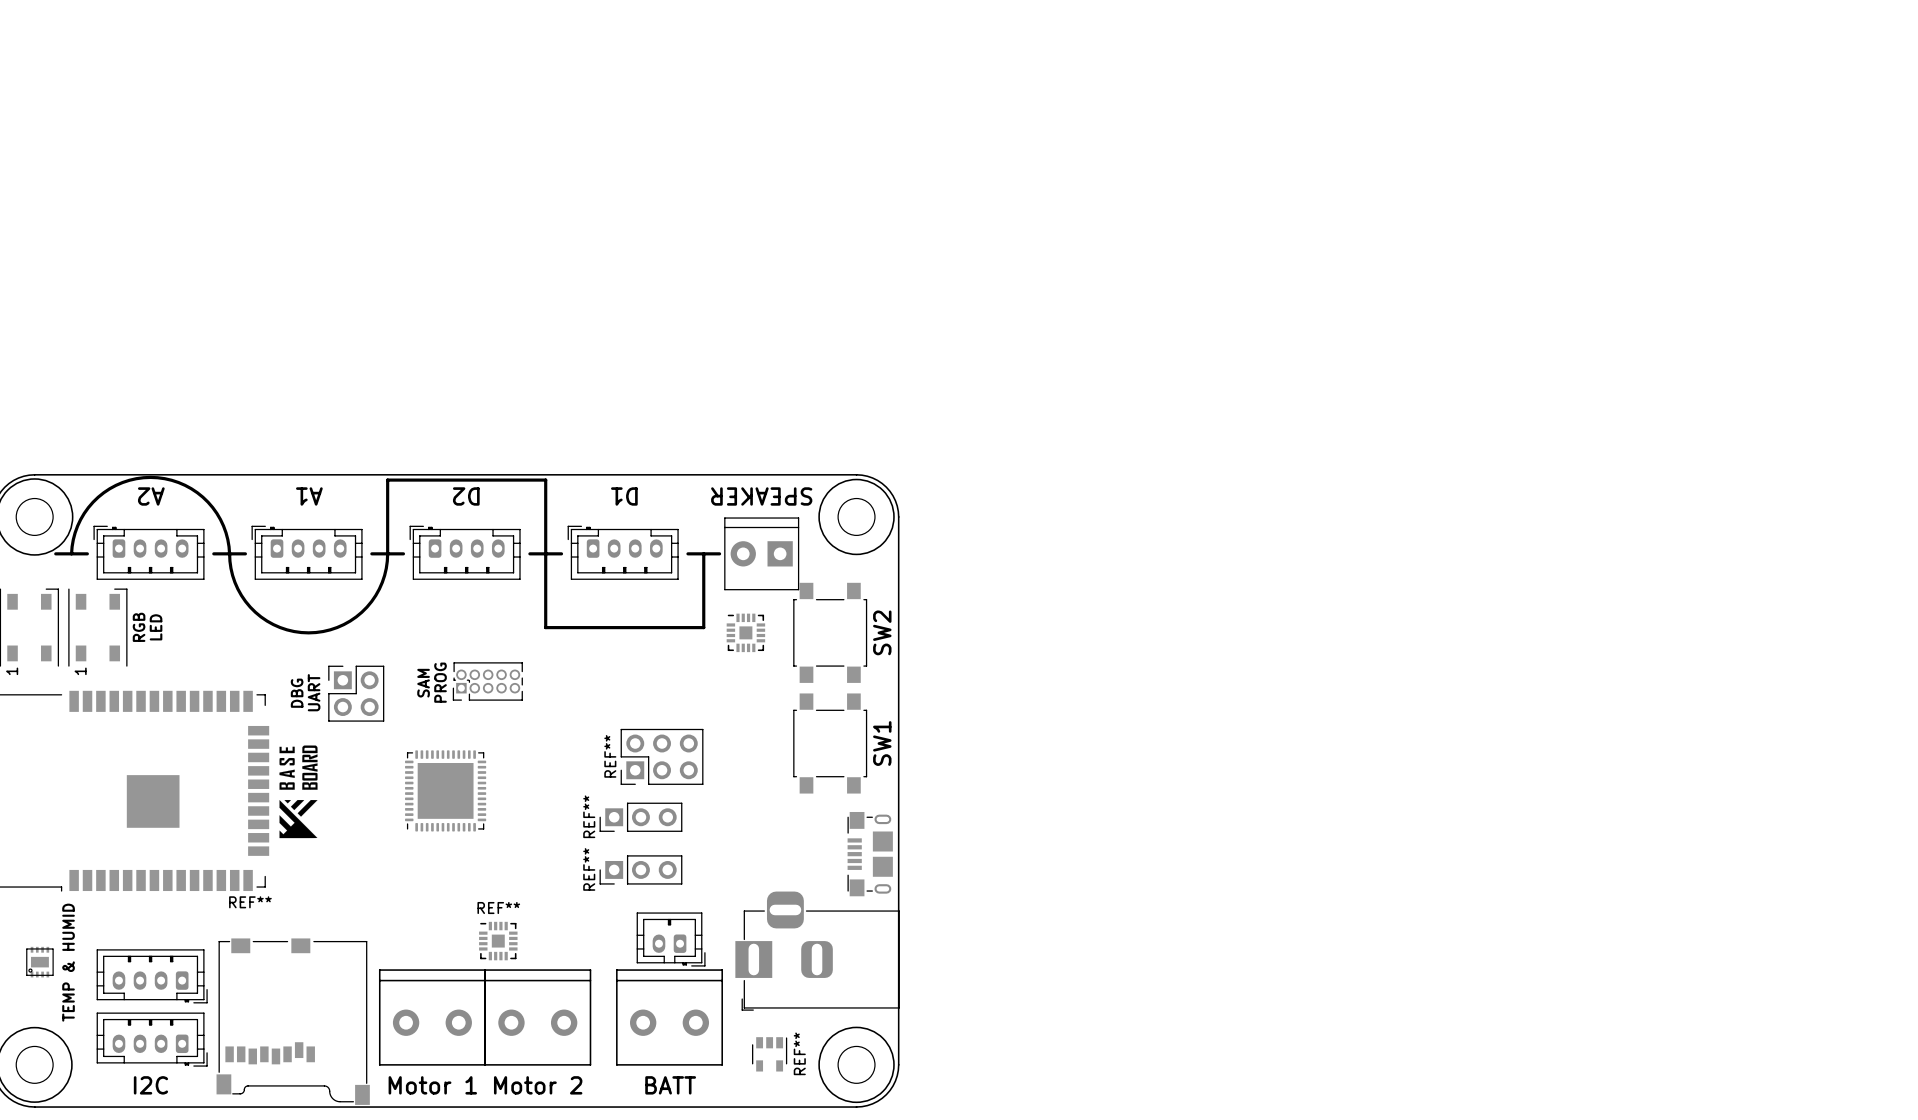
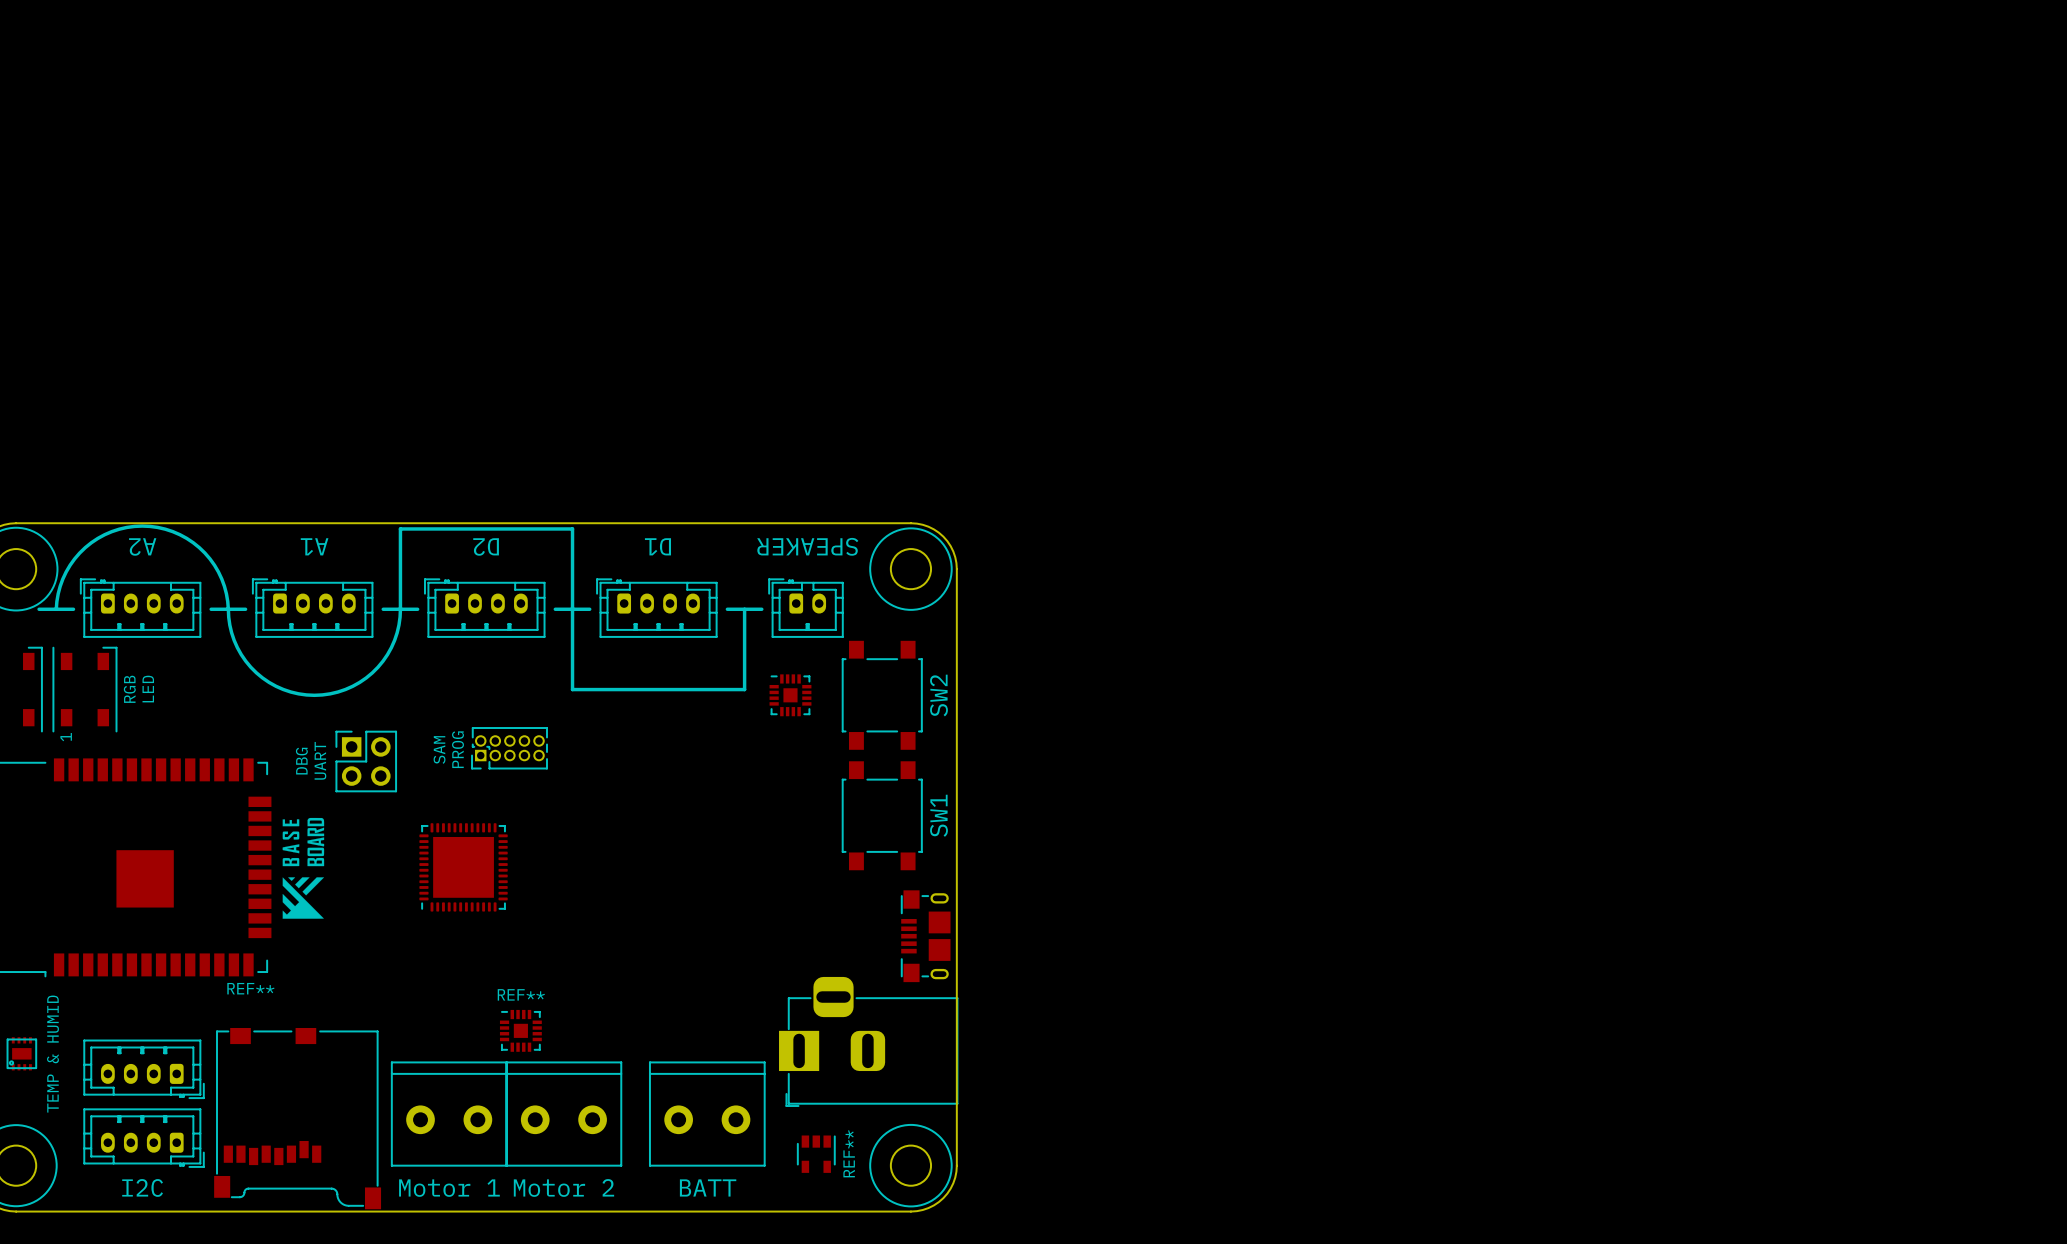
part footprint: [724, 517, 800, 591] -> [768, 578, 844, 638]
REF**: (662, 756) -> none
REF**: (640, 817) -> none
REF**: (640, 869) -> none
part: (671, 939) -> none

